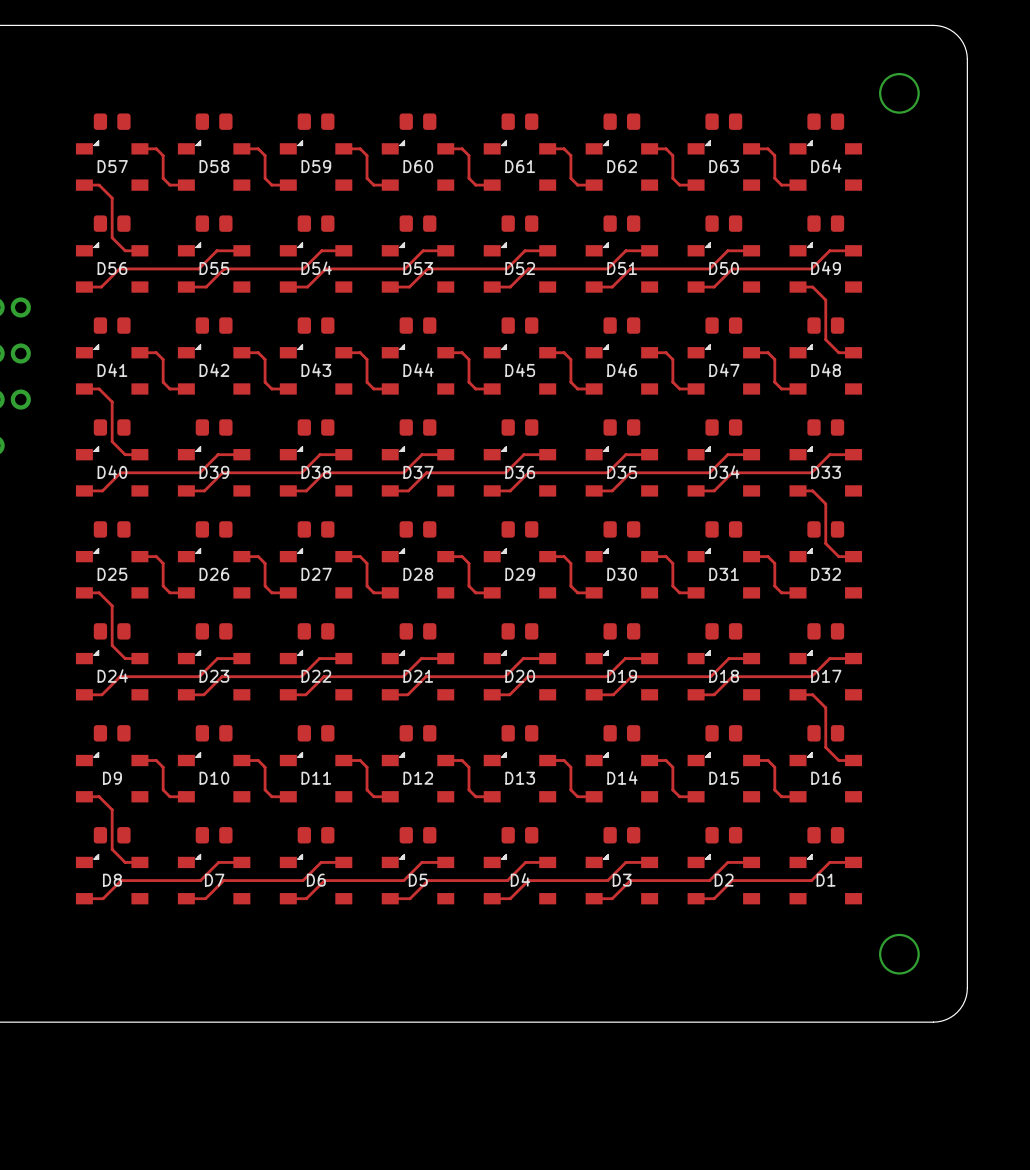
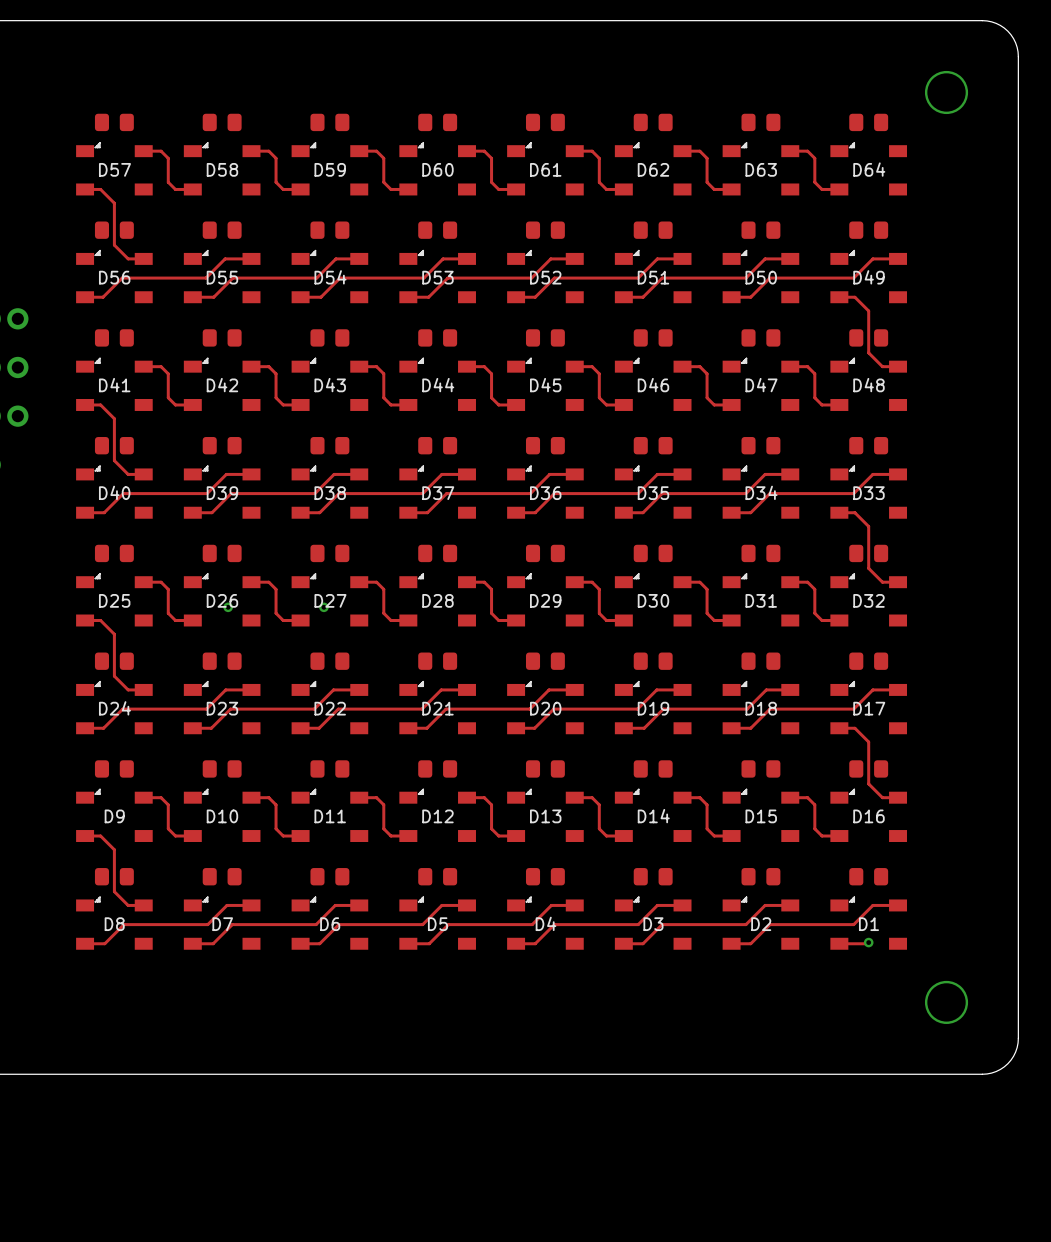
via: none -> (228, 607)
via: none -> (323, 607)
track: none -> (868, 942) (839, 943)
via: none -> (868, 942)

